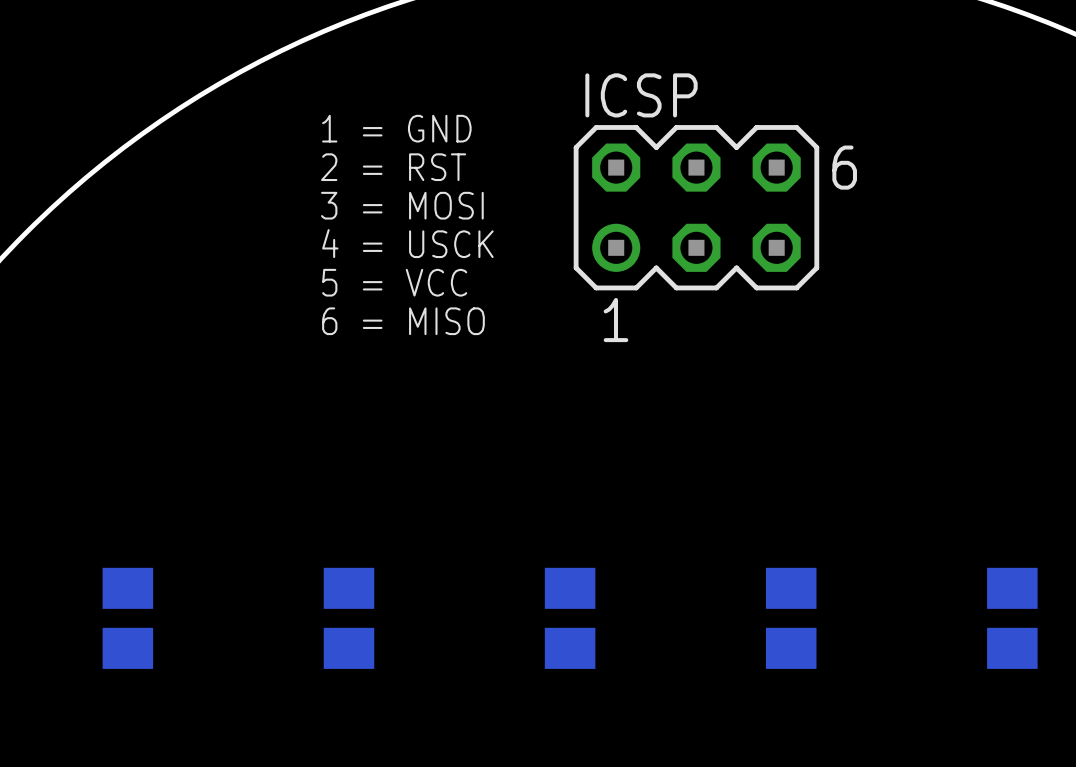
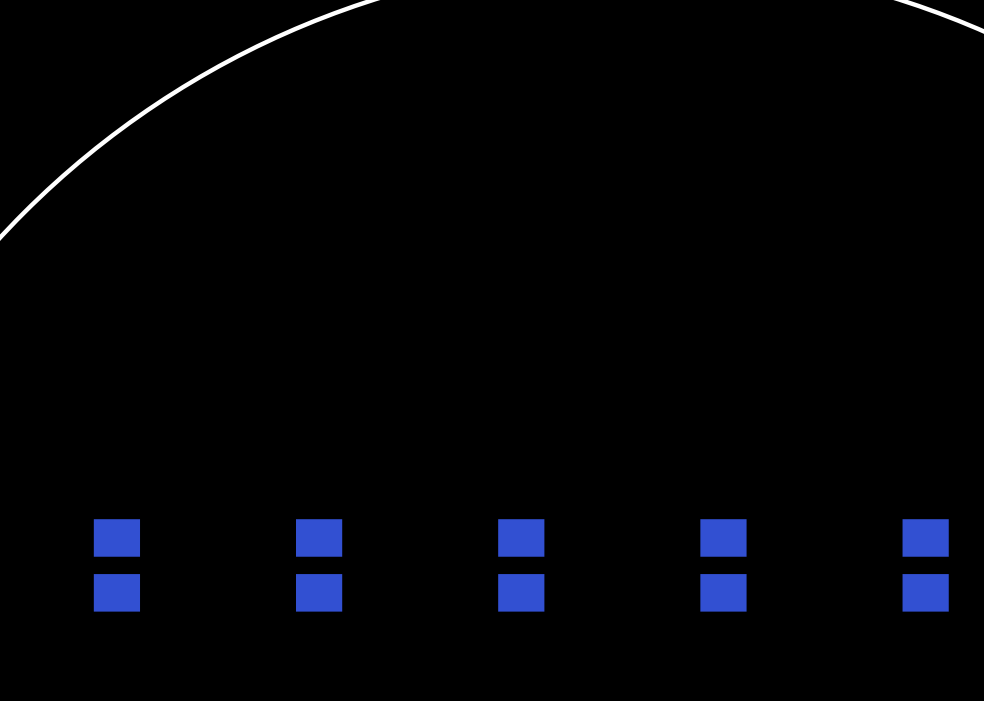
text: 1 = GND (396, 128) -> none
text: 2 = RST (393, 167) -> none
text: 3 = MOSI (402, 205) -> none
ICSP: (696, 207) -> none
text: 4 = USCK (407, 243) -> none
text: 5 = VCC (394, 282) -> none
text: 6 = MISO (403, 321) -> none

